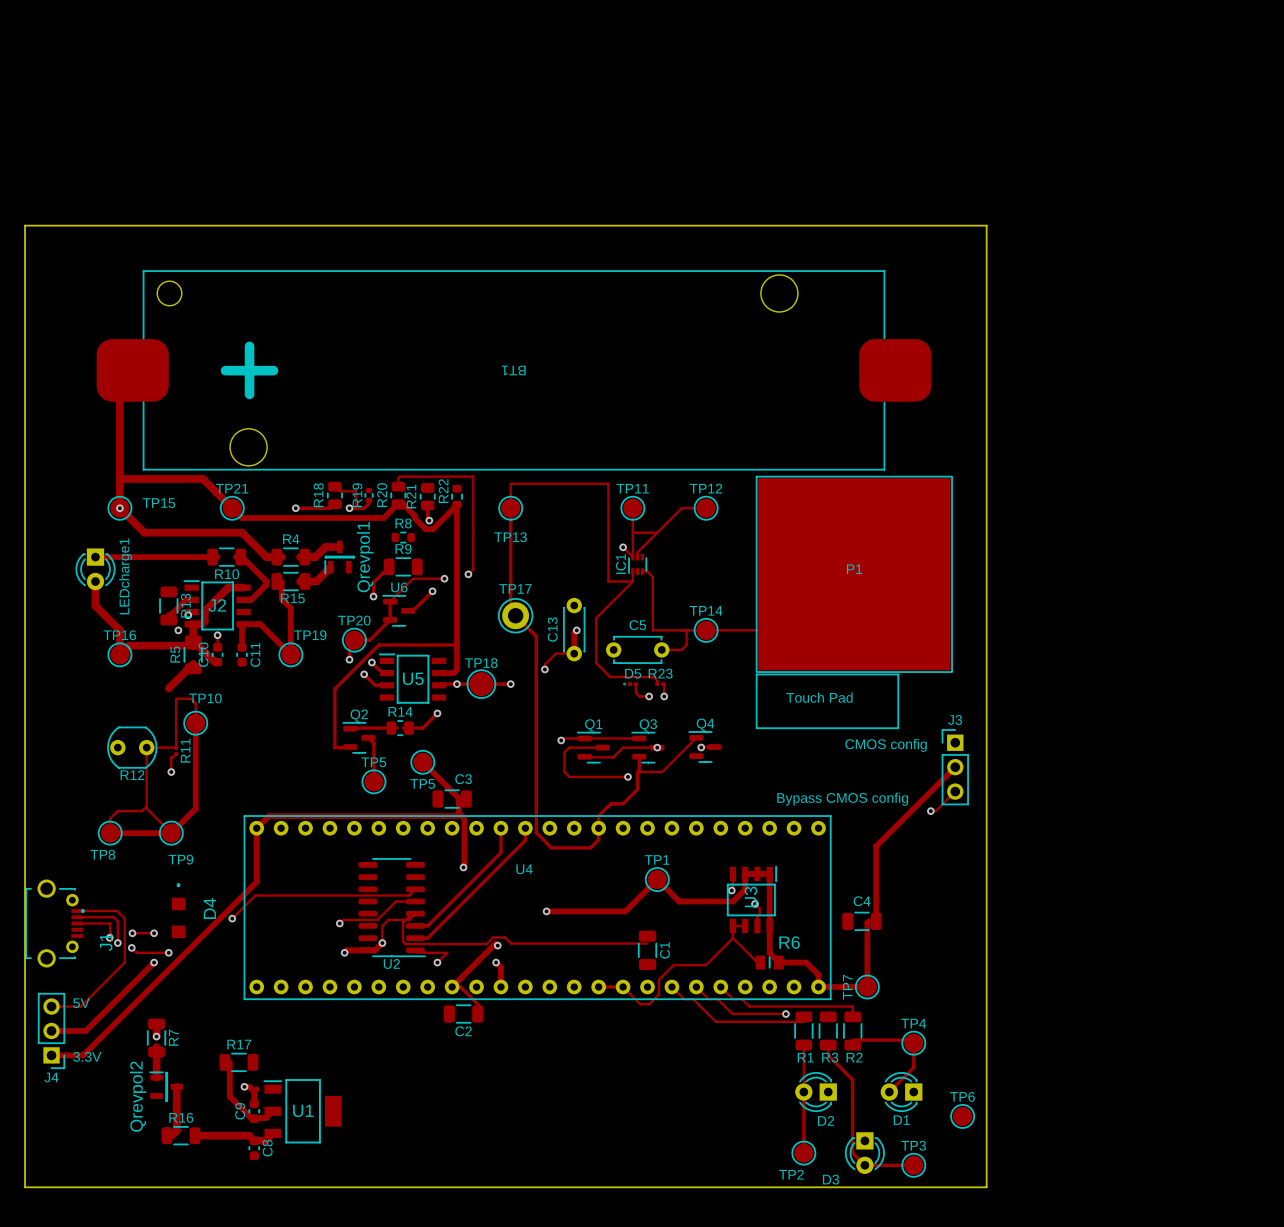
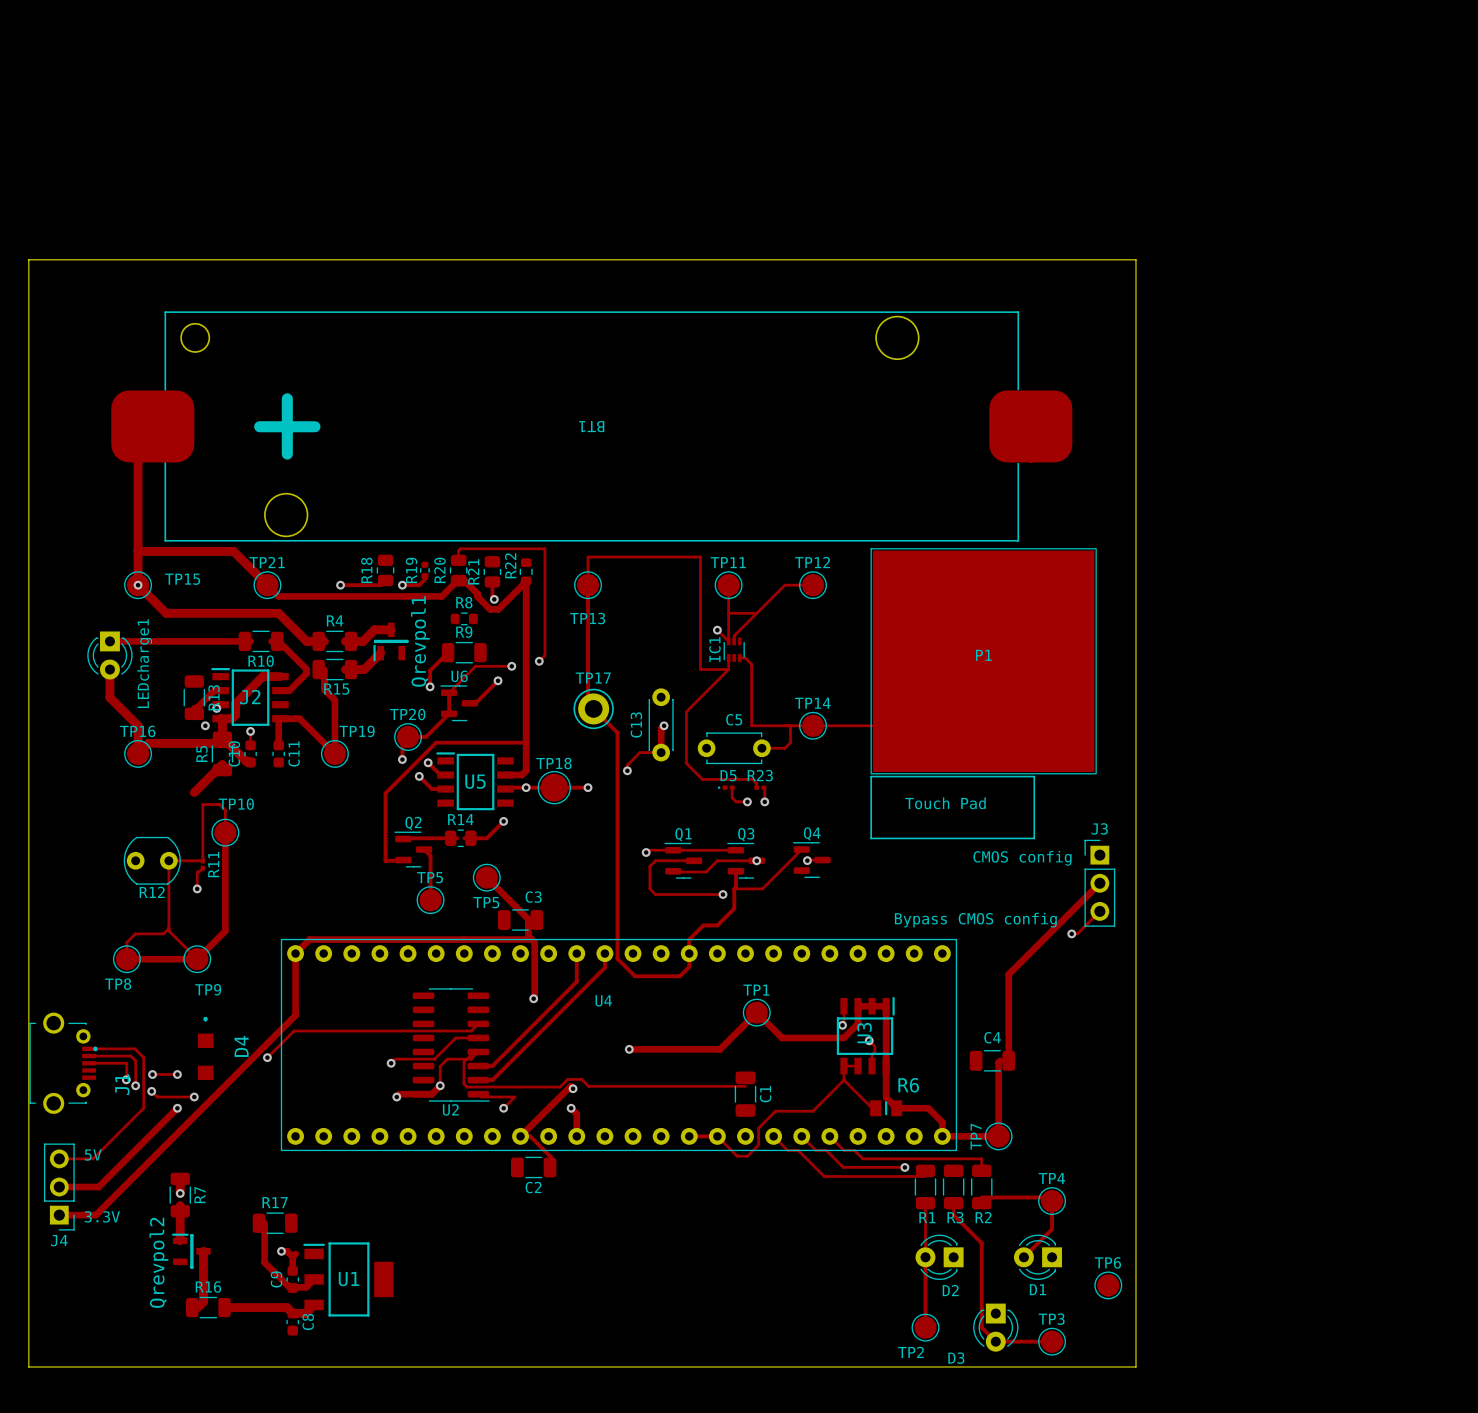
track: (334, 486) (339, 491) (356, 491) (356, 508) -> none

